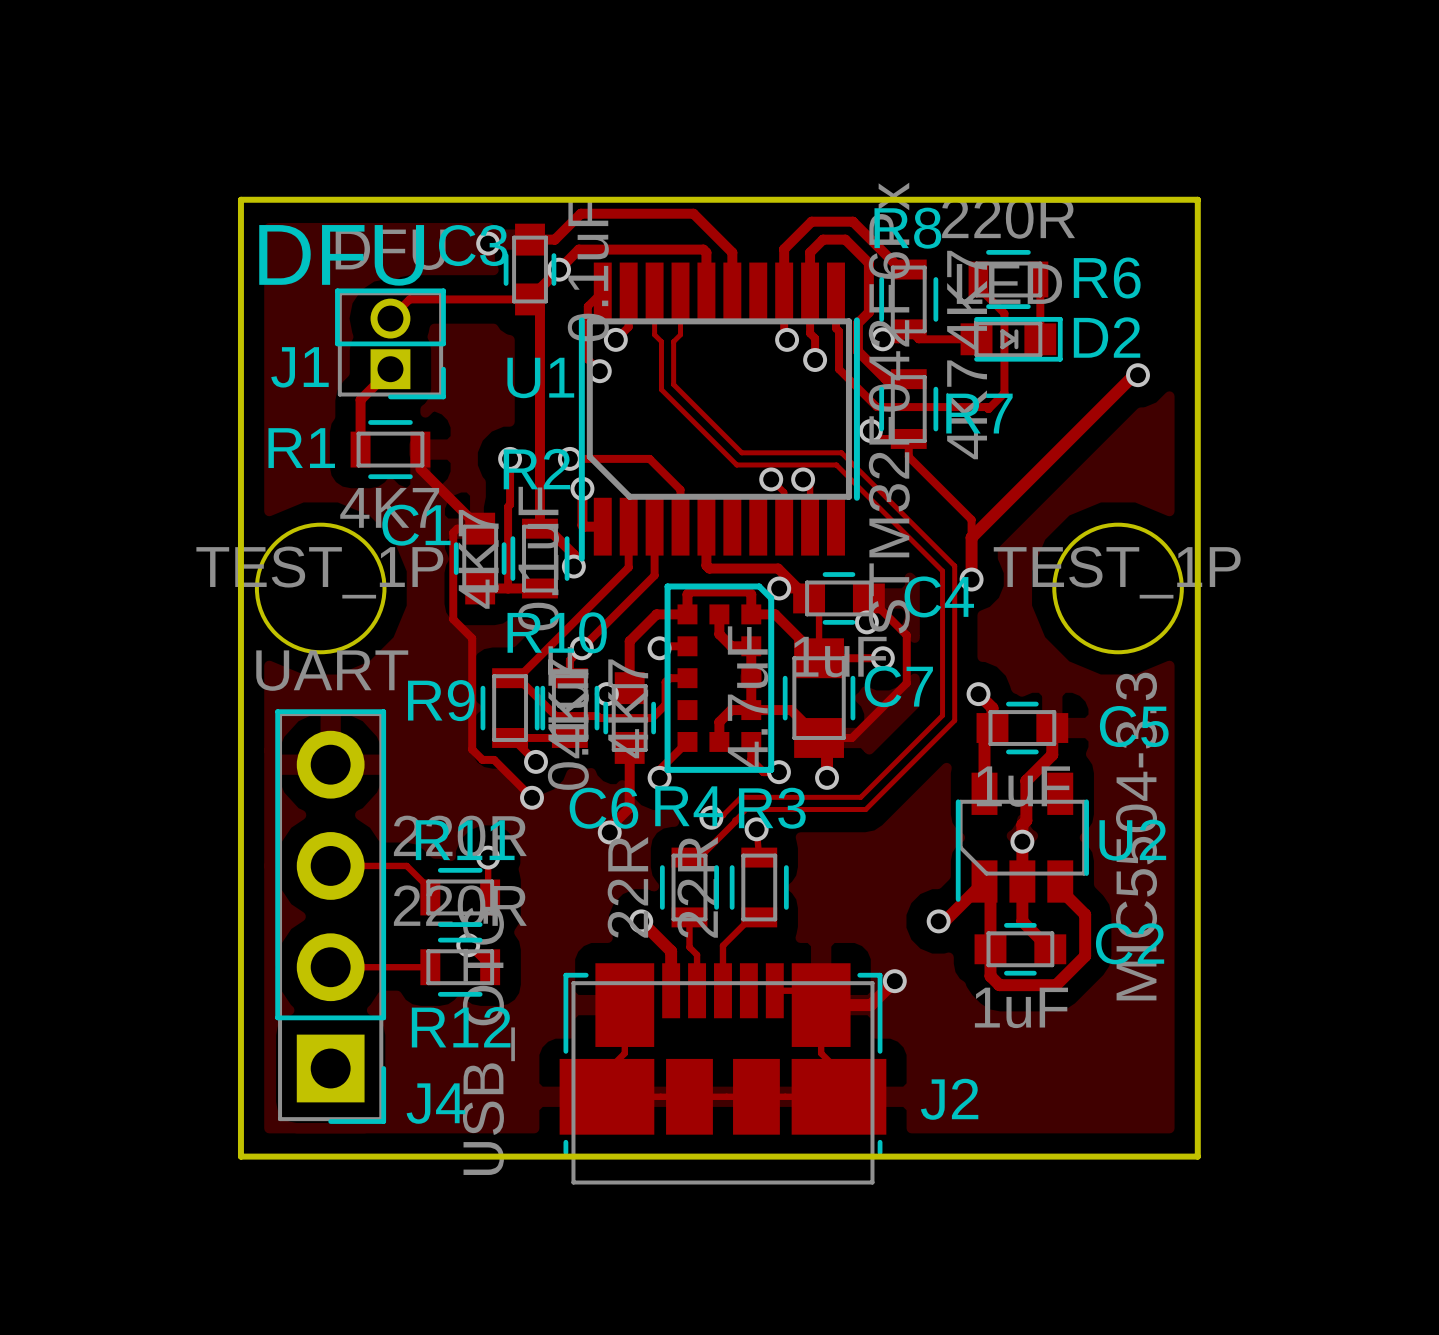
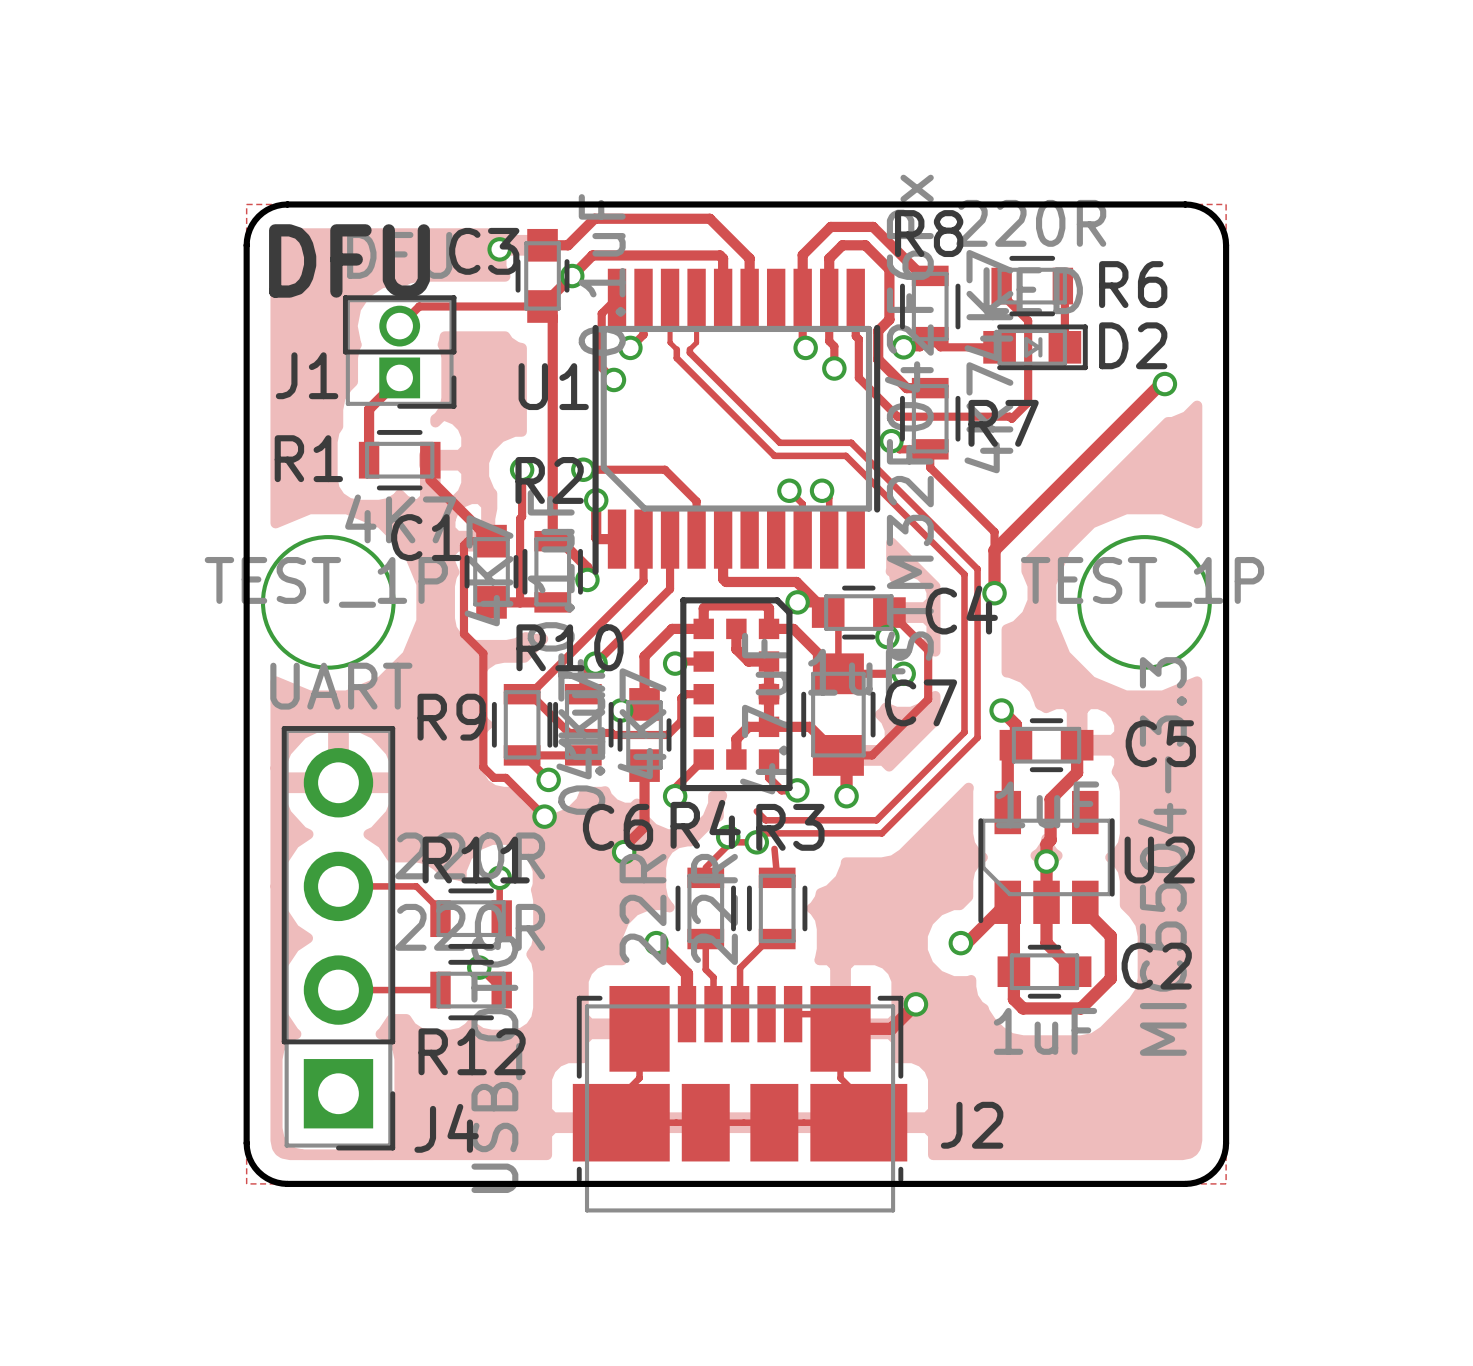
board edge: (280, 199) (240, 199) (240, 239) -> (287, 204) (271, 207) (258, 216) (249, 229) (246, 245)
board edge: (1157, 199) (1197, 199) (1197, 239) -> (1185, 204) (1200, 207) (1214, 216) (1222, 229) (1226, 245)
track: (661, 341) (661, 389) (736, 464) (836, 464) (942, 571) (942, 715) (860, 797) (741, 797) (723, 815) (713, 815) (711, 817) -> (676, 349) (676, 358) (774, 455) (845, 455) (964, 574) (964, 732) (876, 820) (765, 820) (756, 811)
track: (673, 341) (673, 384) (741, 452) (841, 452) (954, 566) (954, 720) (865, 809) (746, 809) (699, 857) (689, 857) -> (689, 349) (689, 352) (779, 442) (851, 442) (977, 569) (977, 737) (881, 833) (765, 833) (756, 842) (731, 842) (705, 867)
via position: (756, 829) -> (756, 842)
board edge: (240, 1116) (240, 1156) (280, 1156) -> (246, 1143) (249, 1158) (258, 1171) (271, 1180) (287, 1183)
board edge: (1197, 1116) (1197, 1156) (1157, 1156) -> (1226, 1143) (1222, 1158) (1214, 1171) (1200, 1180) (1185, 1183)

